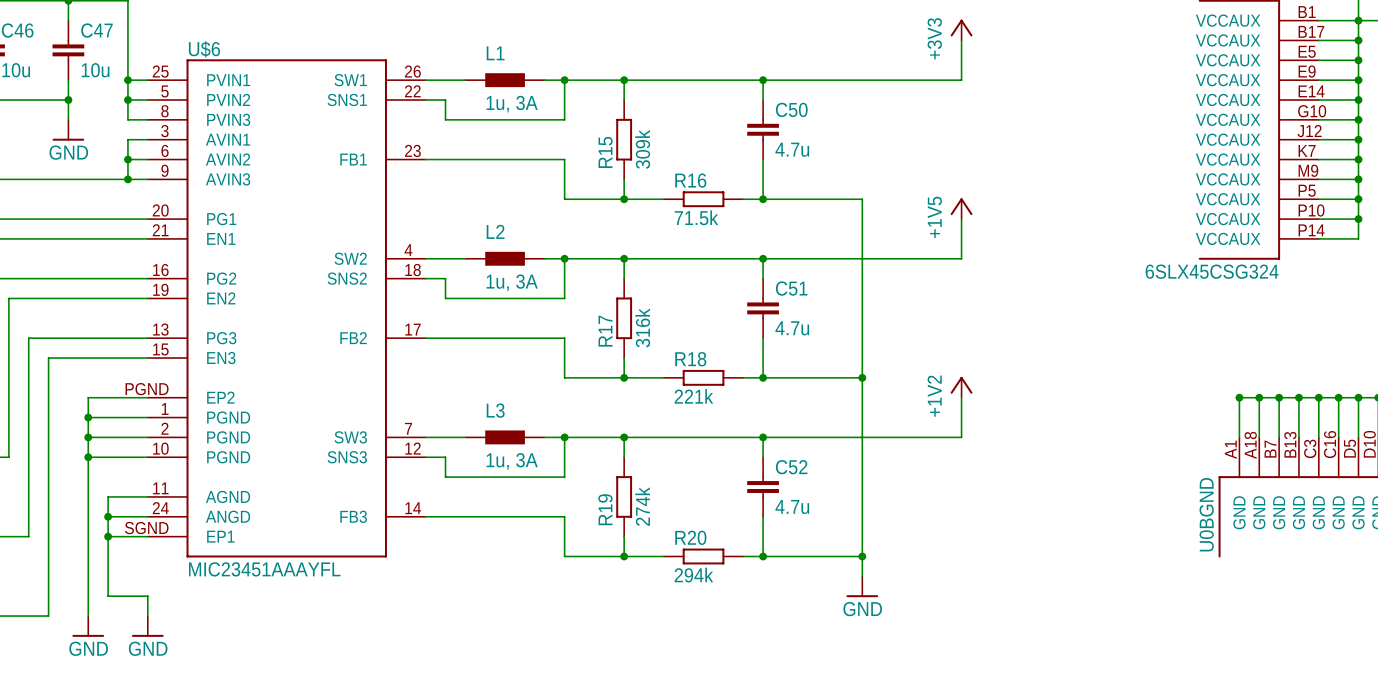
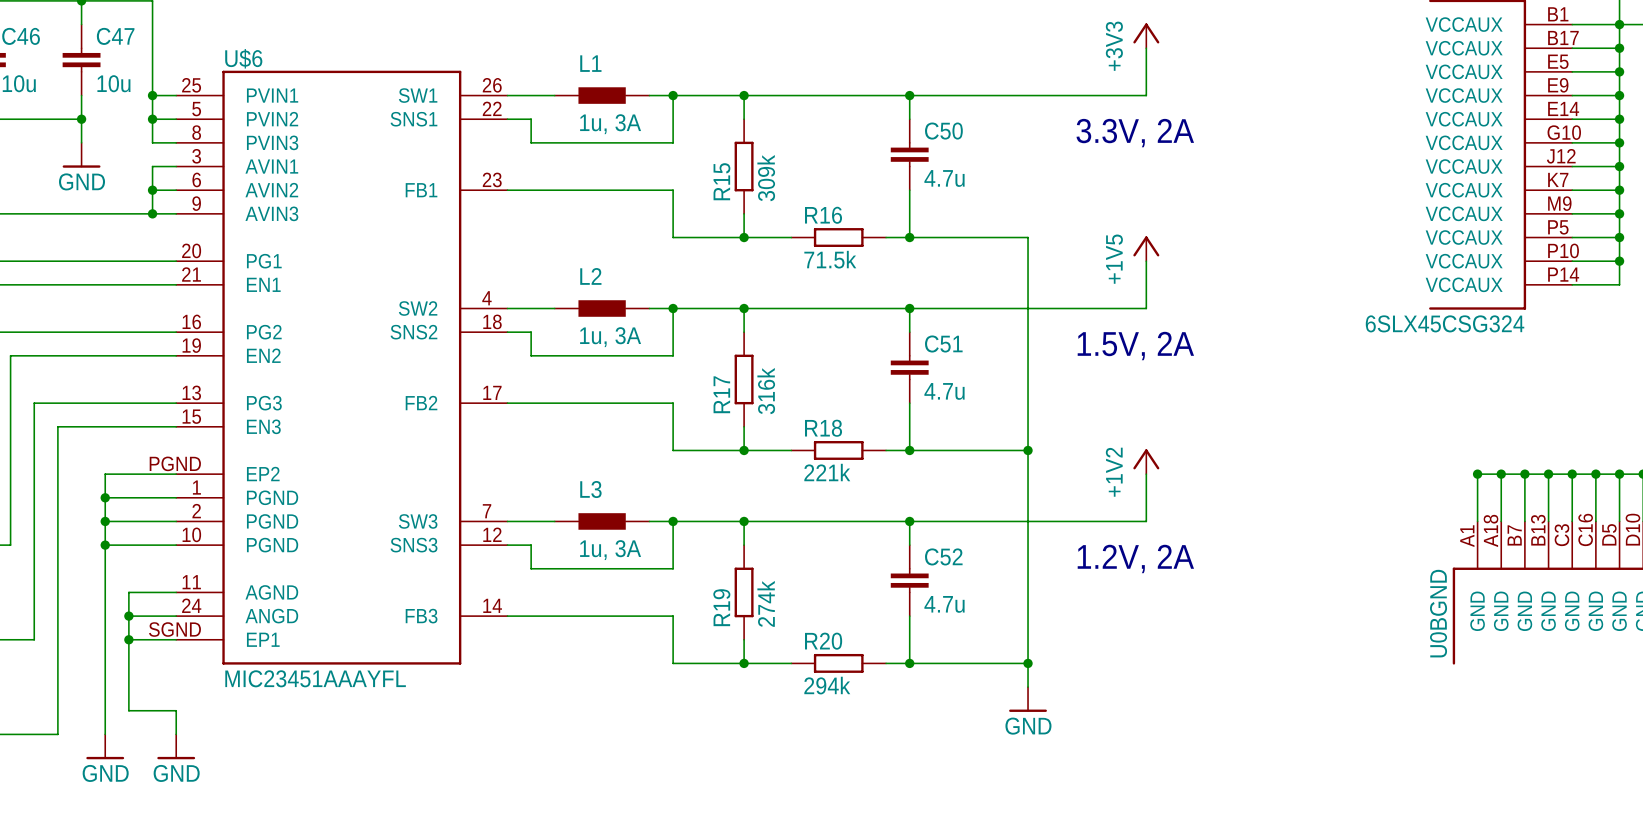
text: none -> 3.3V, 2A (1135, 133)
text: none -> 1.5V, 2A (1135, 346)
text: none -> 1.2V, 2A (1135, 558)

